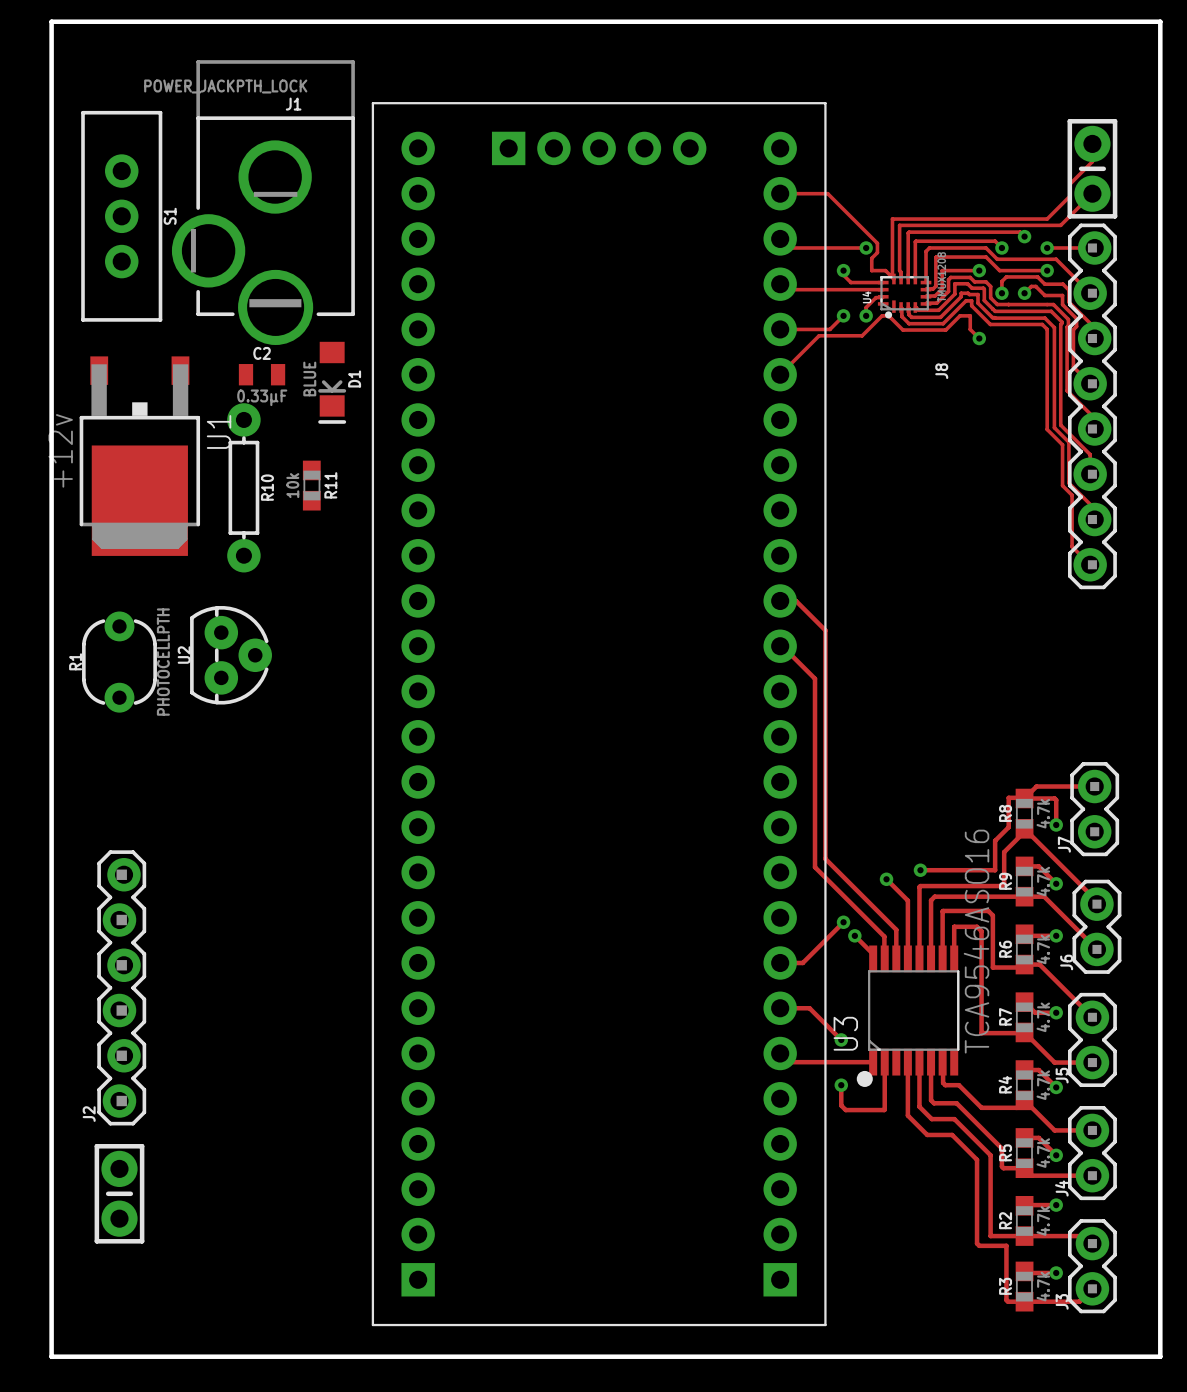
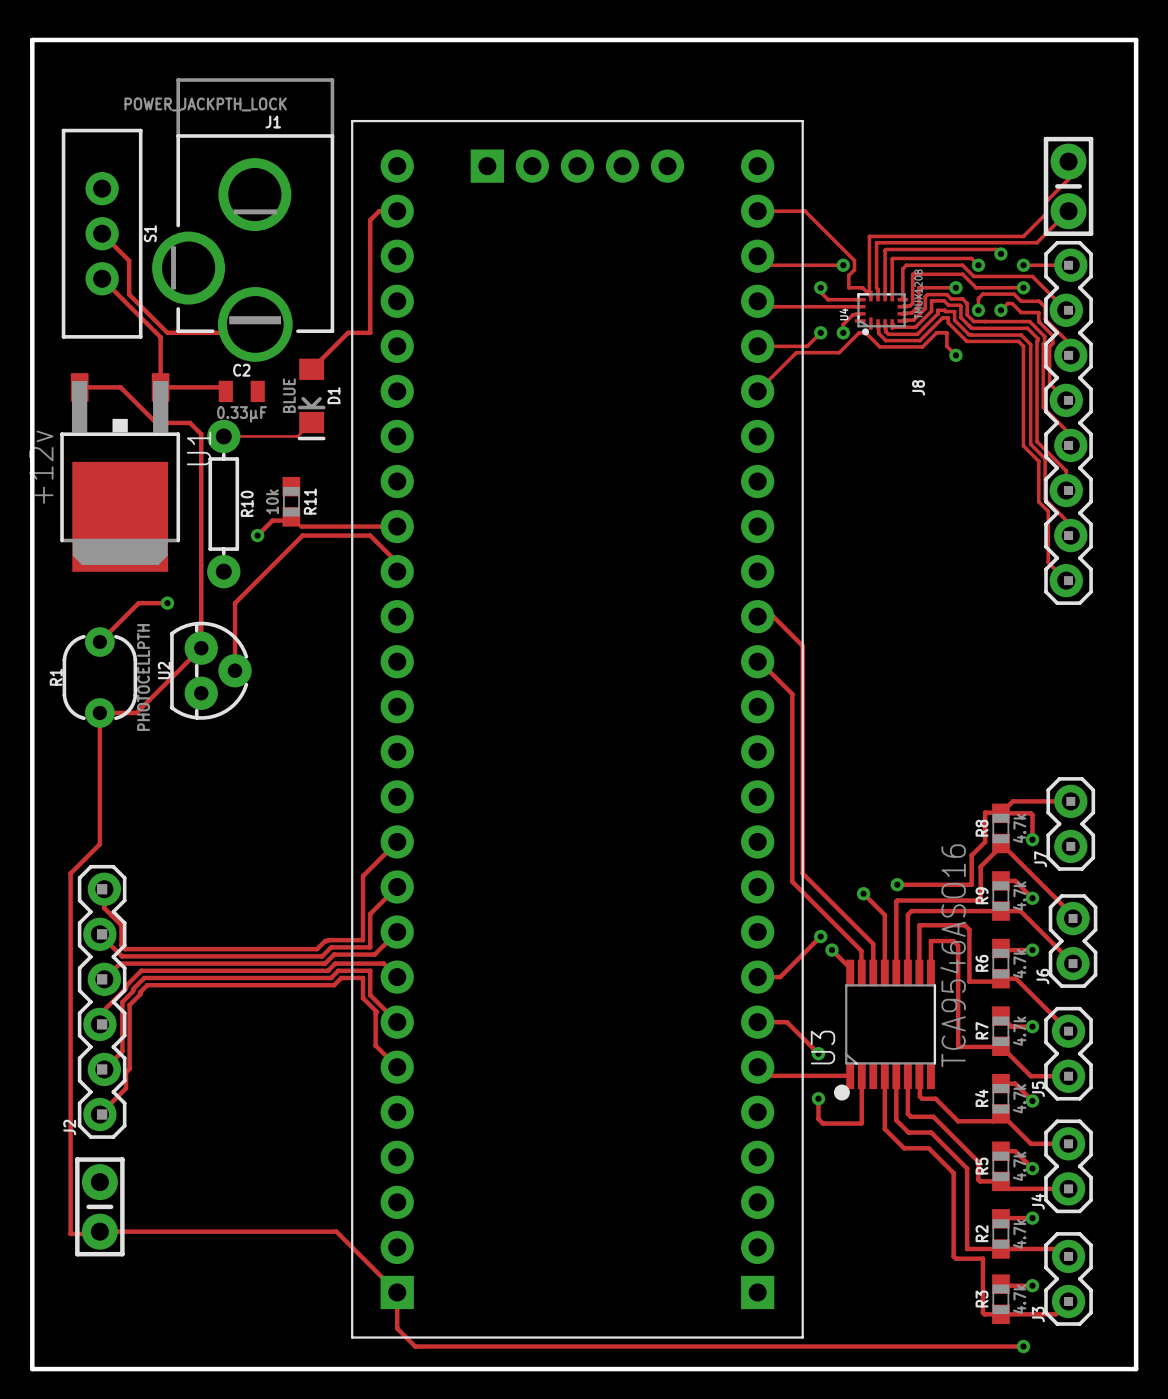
track: none -> (397, 211) (379, 211) (370, 220) (370, 332) (348, 332) (311, 369)
track: none -> (102, 233) (129, 260) (129, 294) (167, 332) (246, 332) (255, 324)
track: none -> (102, 278) (160, 337) (160, 387) (221, 387) (225, 391)
track: none -> (79, 387) (120, 387) (156, 422) (189, 422) (201, 434) (201, 648) (136, 712) (99, 712) (99, 844) (70, 873) (70, 1233) (97, 1233) (99, 1231) (336, 1231) (397, 1292) (397, 1328) (415, 1346) (1023, 1346)
track: none -> (311, 422) (297, 436) (223, 436)
track: none -> (291, 516) (301, 526) (397, 526)
track: none -> (295, 520) (272, 520) (257, 535)
via: none -> (257, 535)
track: none -> (397, 571) (397, 562) (370, 535) (302, 535) (235, 603) (235, 670)
track: none -> (167, 603) (138, 603) (99, 642)
via: none -> (167, 603)
track: none -> (397, 841) (362, 876) (362, 940) (328, 940) (317, 949) (124, 949) (121, 945) (121, 925) (104, 908) (104, 889)
track: none -> (397, 886) (370, 914) (370, 947) (331, 947) (322, 956) (121, 956) (99, 934)
track: none -> (397, 932) (374, 954) (334, 954) (325, 963) (120, 963) (104, 979)
track: none -> (397, 977) (383, 963) (335, 963) (328, 970) (141, 970) (99, 1014) (99, 1024)
track: none -> (397, 1022) (370, 995) (370, 970) (338, 970) (331, 978) (144, 978) (122, 1002) (122, 1051) (104, 1069)
track: none -> (397, 1067) (375, 1045) (376, 1011) (362, 998) (362, 978) (341, 978) (334, 985) (147, 985) (129, 1005) (129, 1069) (126, 1072) (126, 1088) (99, 1114)
via: none -> (1023, 1346)

